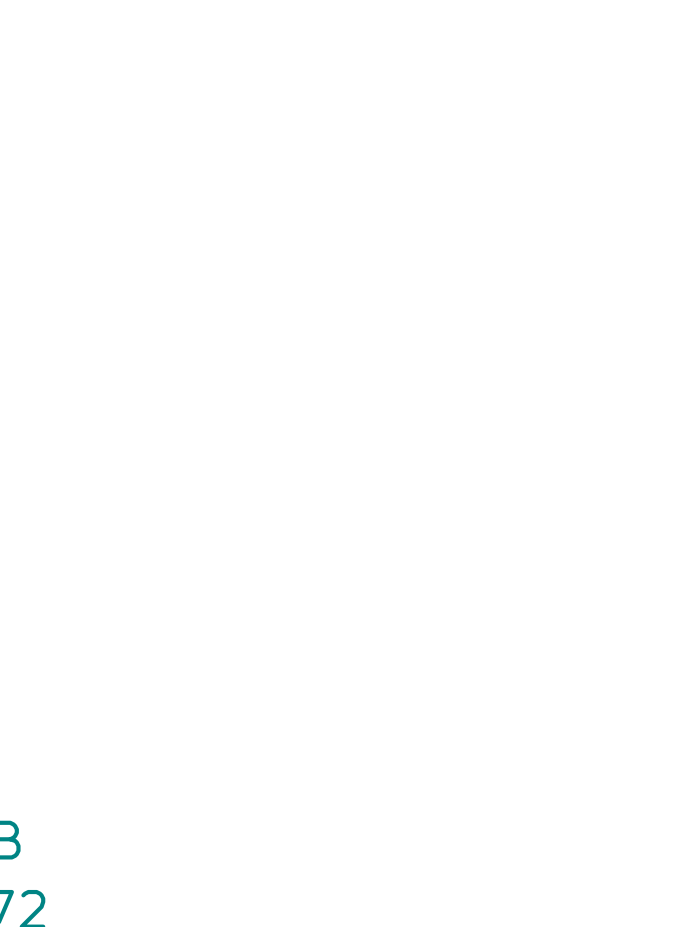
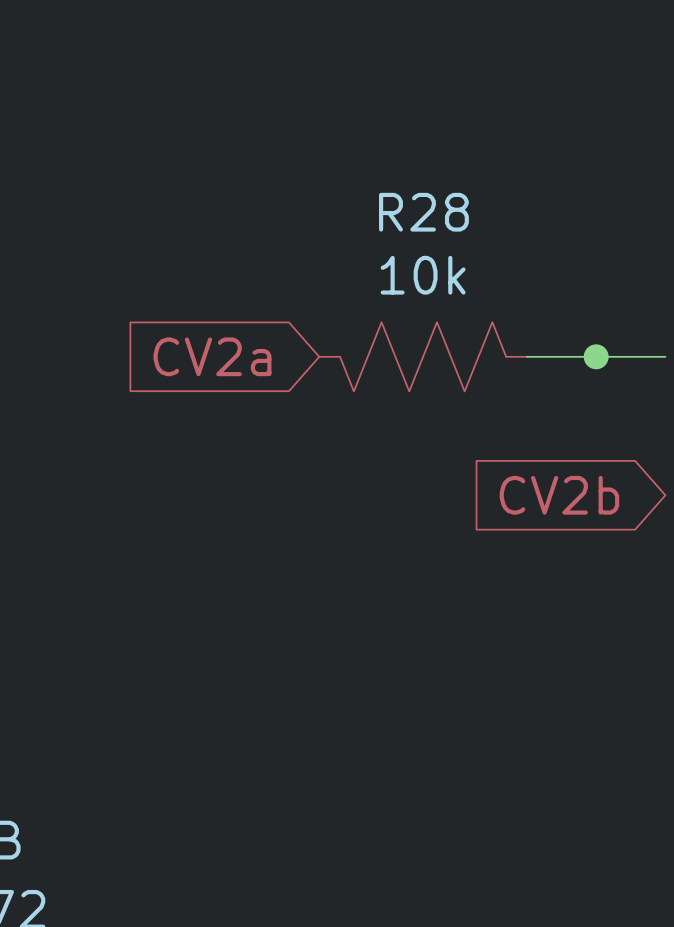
global label: none -> CV2a (212, 356)
R28: none -> 10k (423, 356)
wire: none -> (526, 356) (665, 356)
junction: none -> (596, 356)
global label: none -> CV2b (559, 495)

